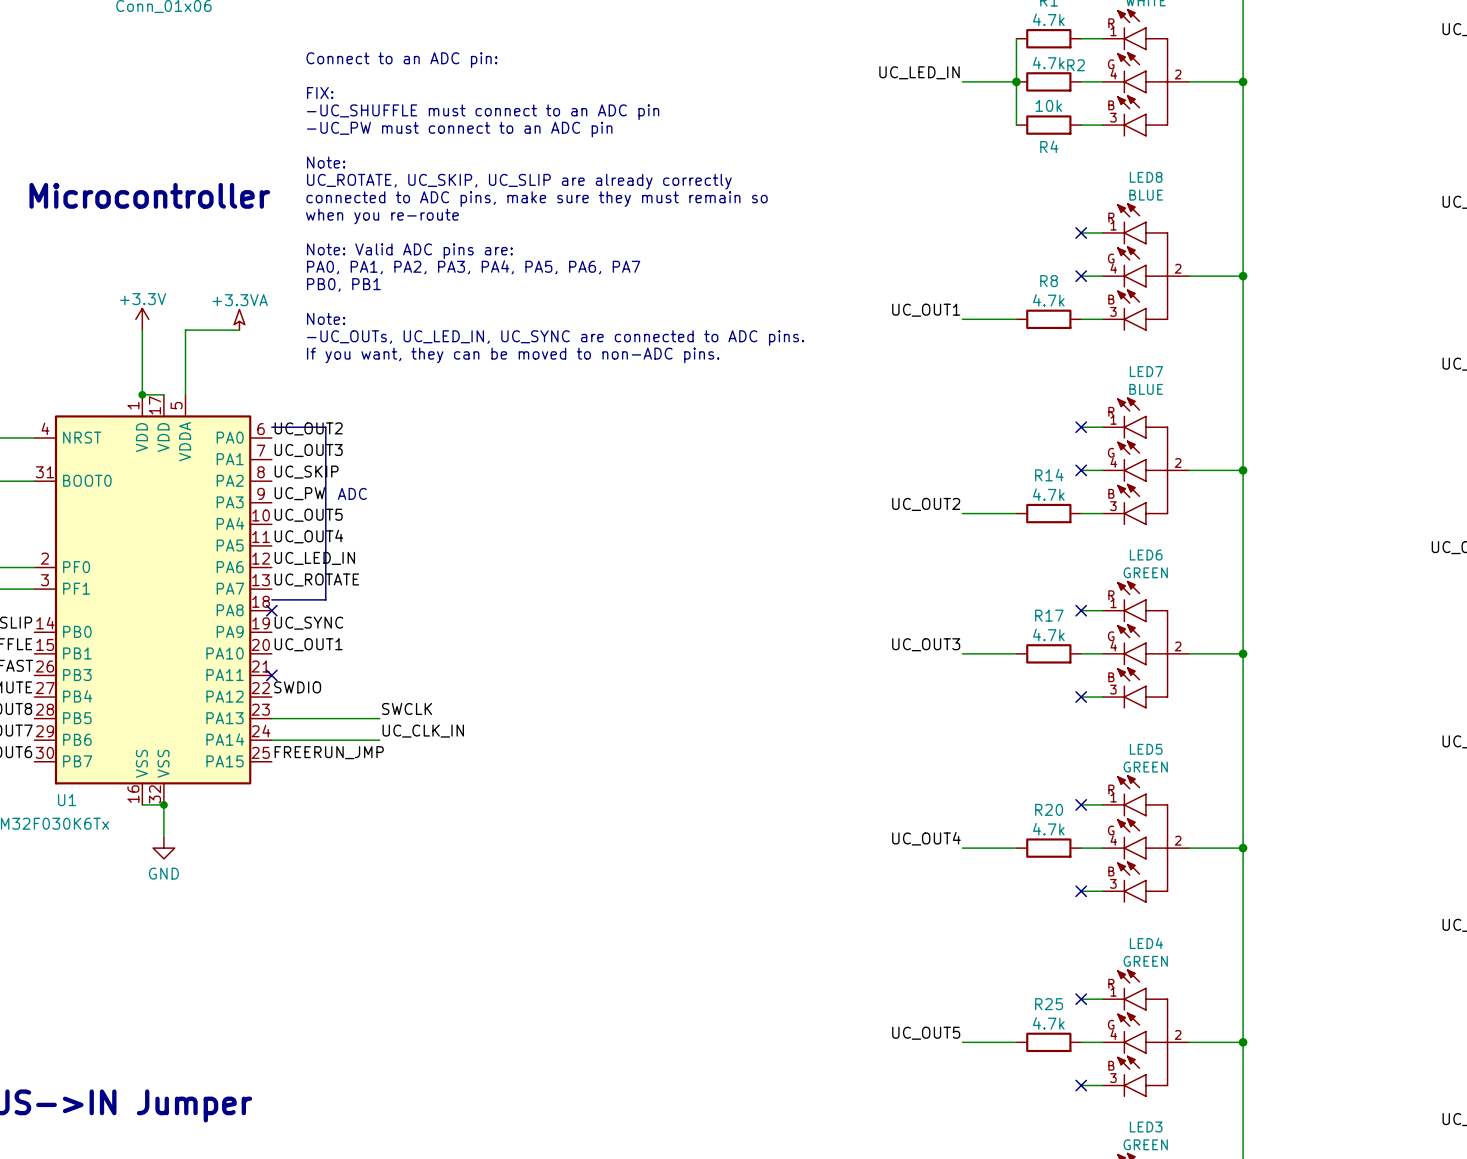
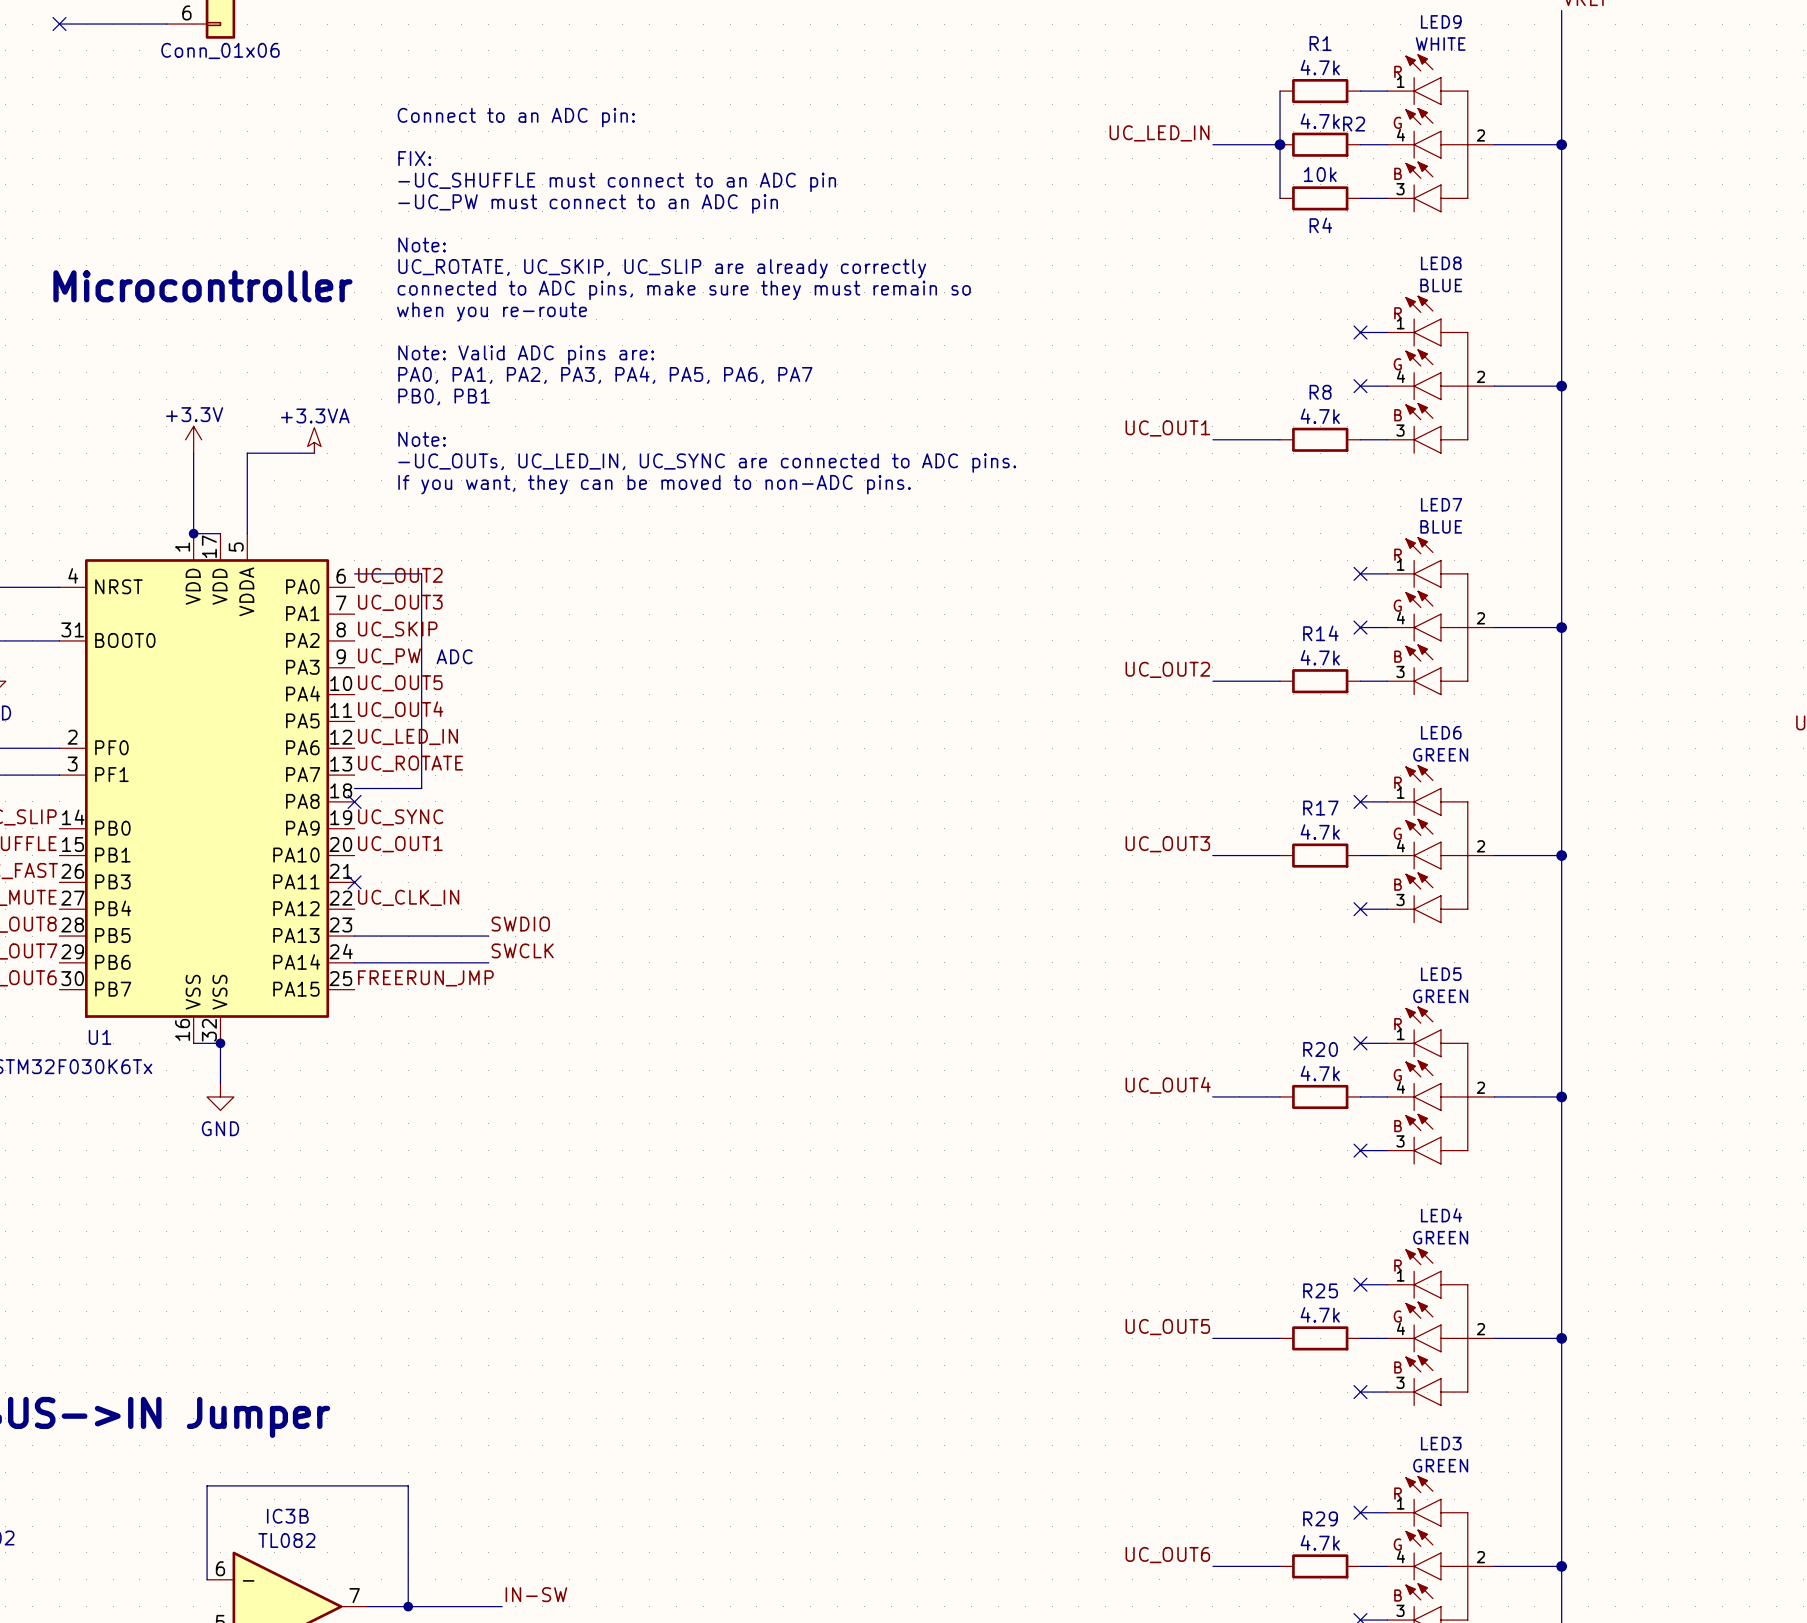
label: SWDIO (297, 687) -> UC_CLK_IN (408, 897)
label: SWCLK (407, 708) -> SWDIO (520, 924)
label: UC_CLK_IN (423, 731) -> SWCLK (522, 950)

